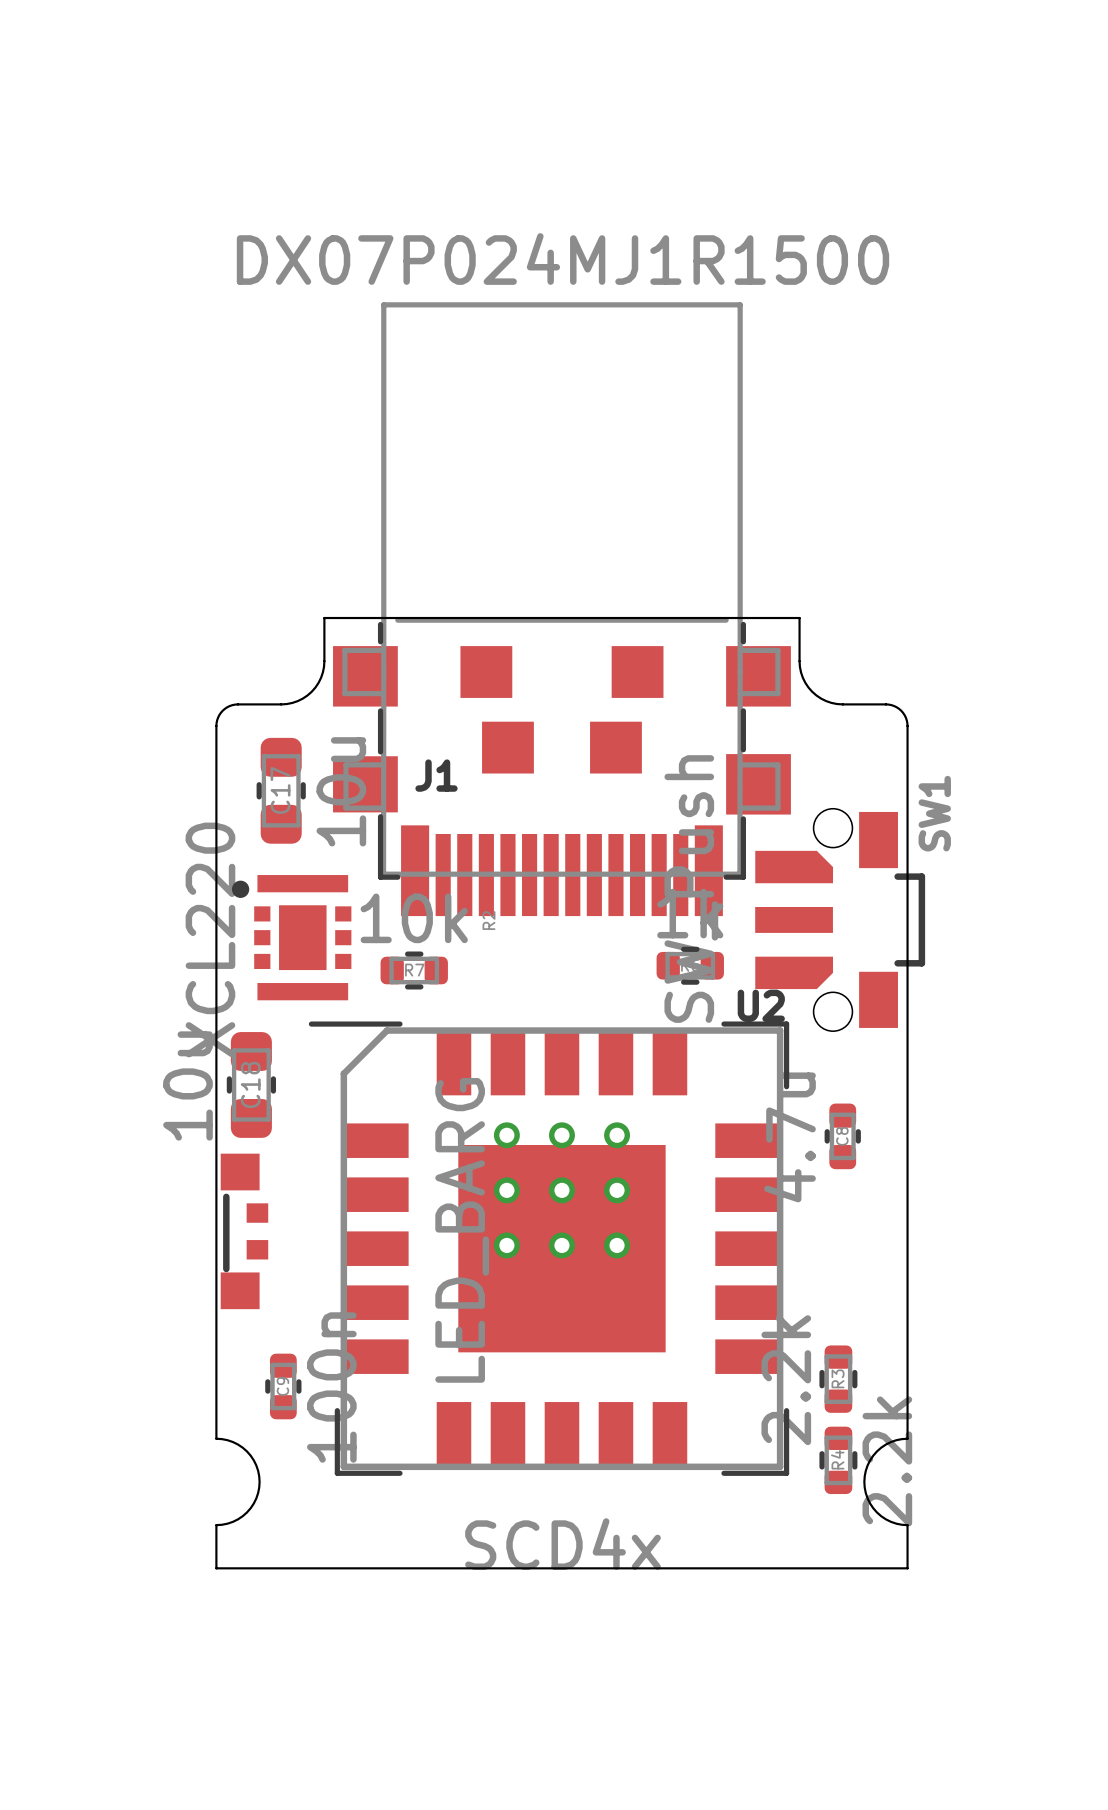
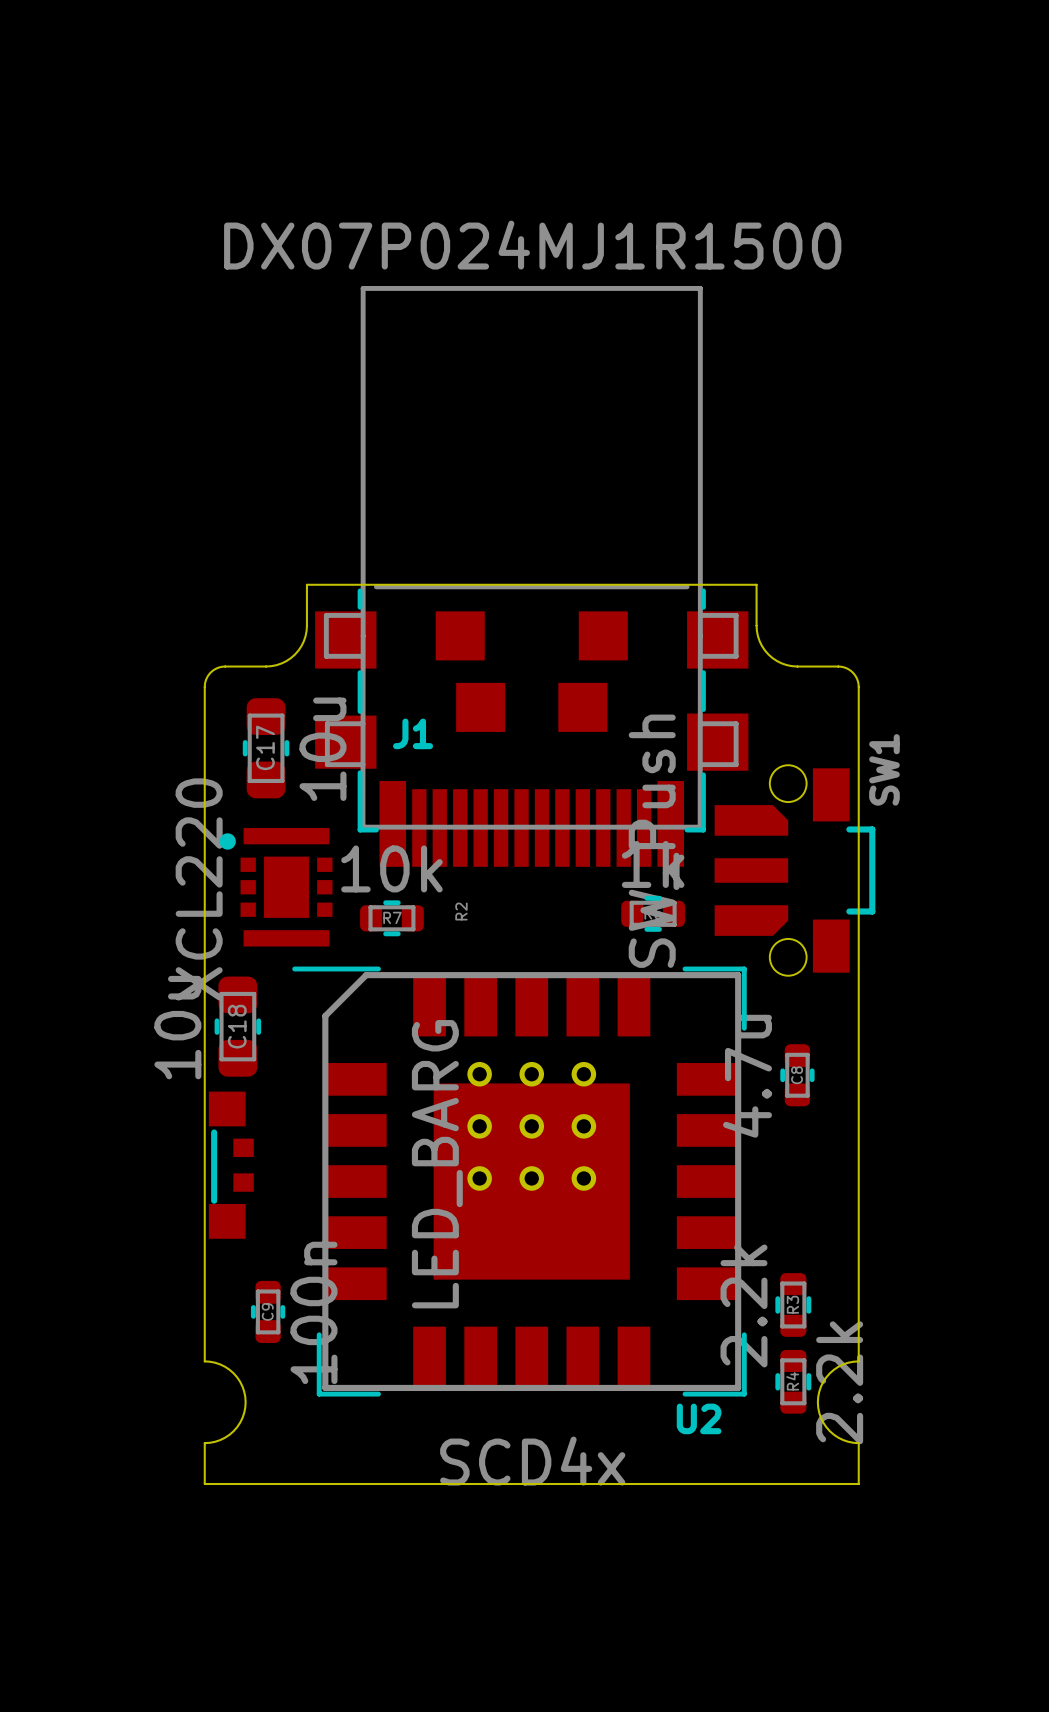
R2 position: (488, 920) -> (461, 911)
U2 name position: U2 (761, 1005) -> U2 (699, 1418)

